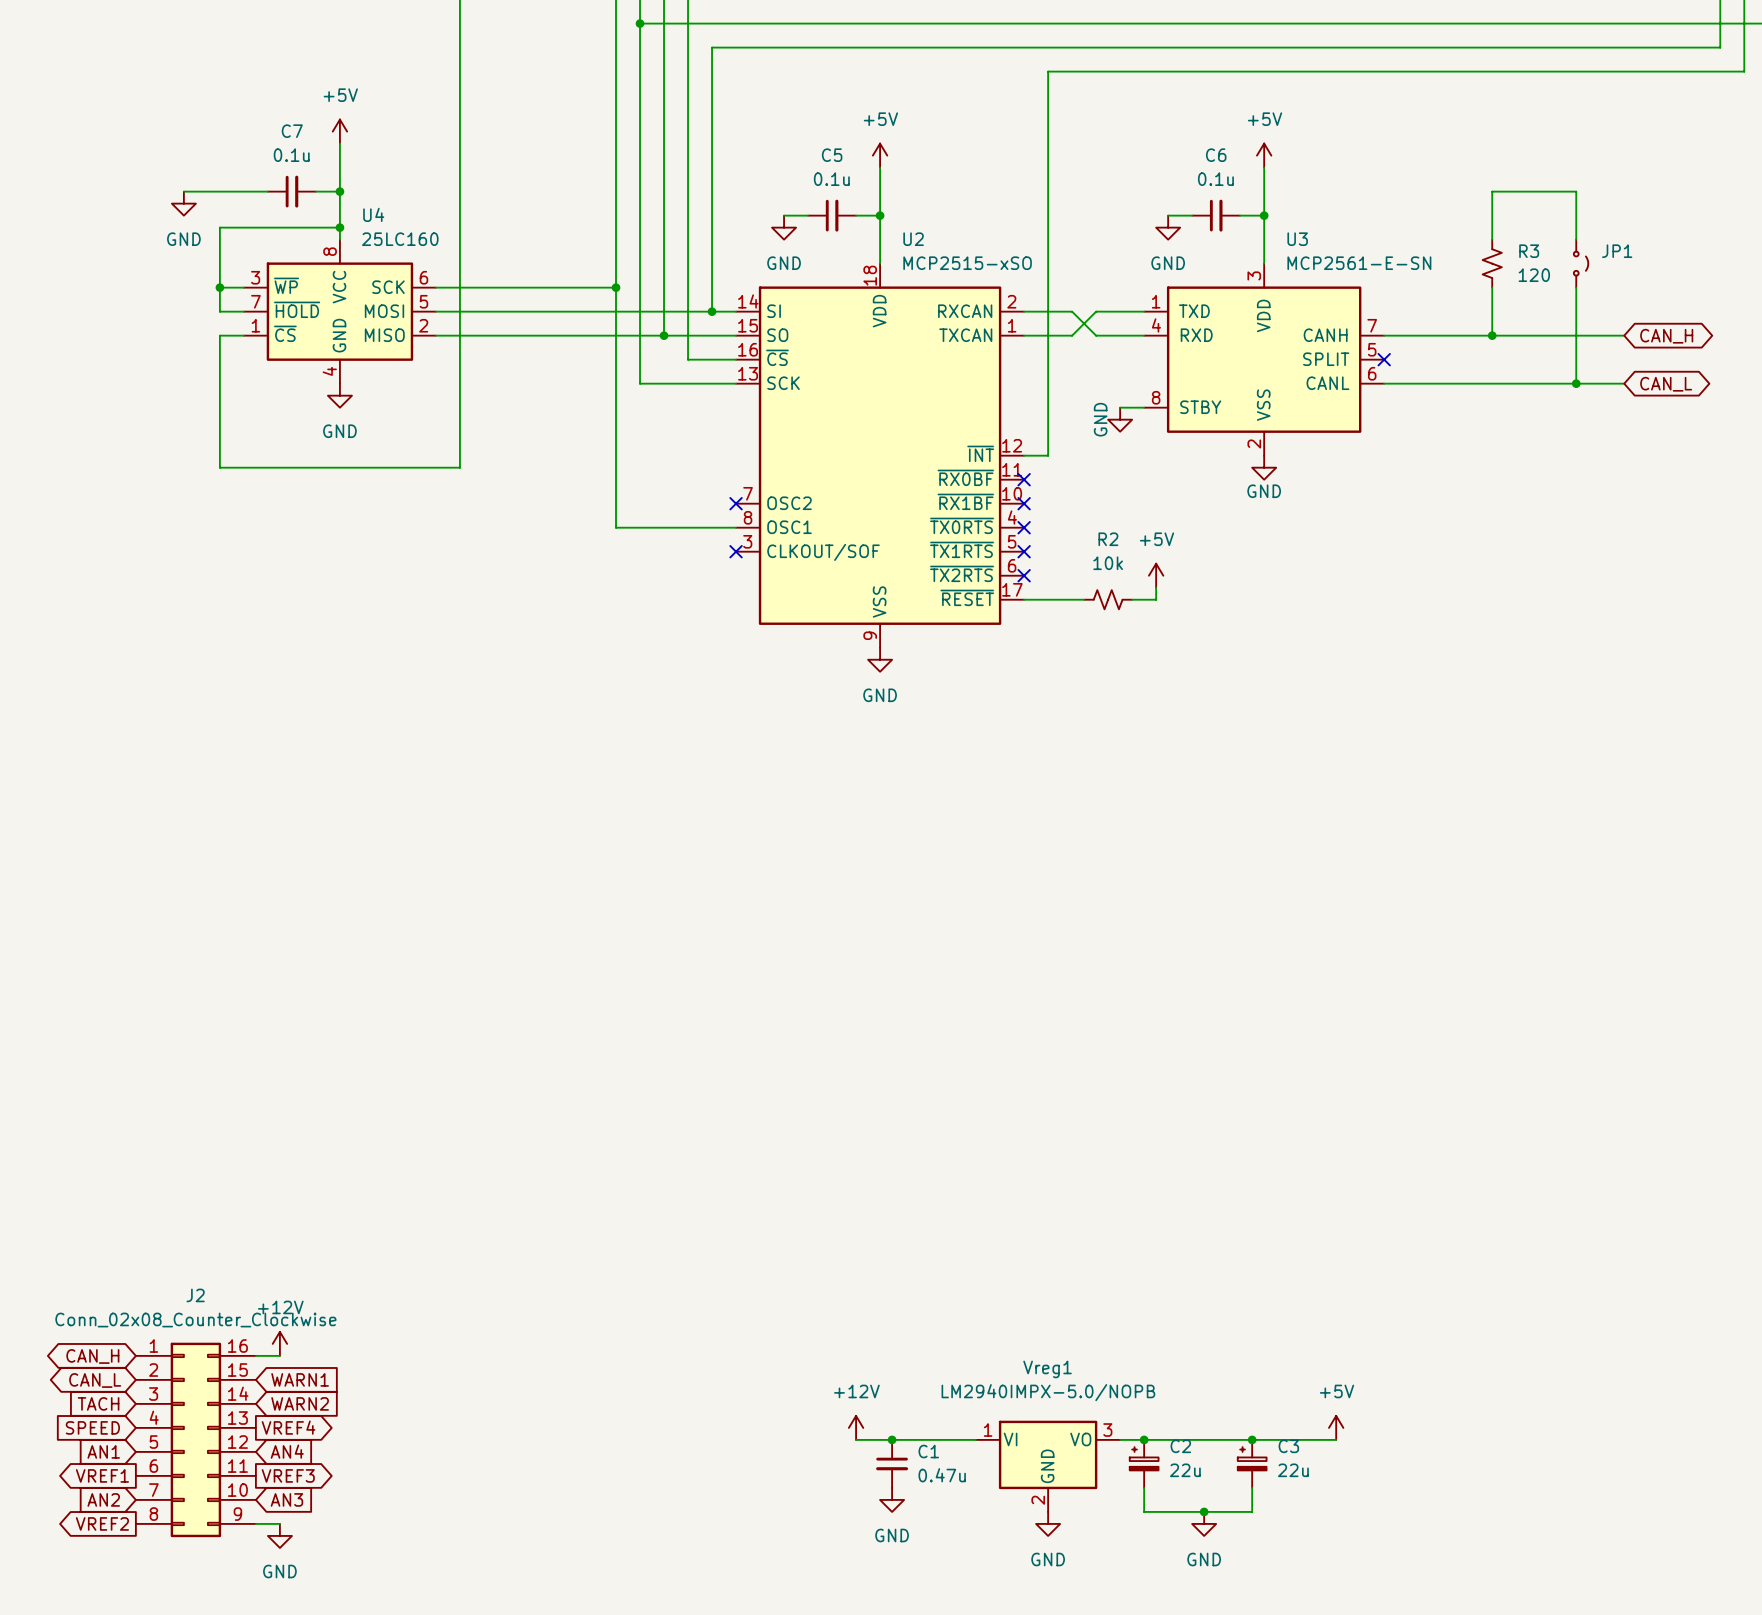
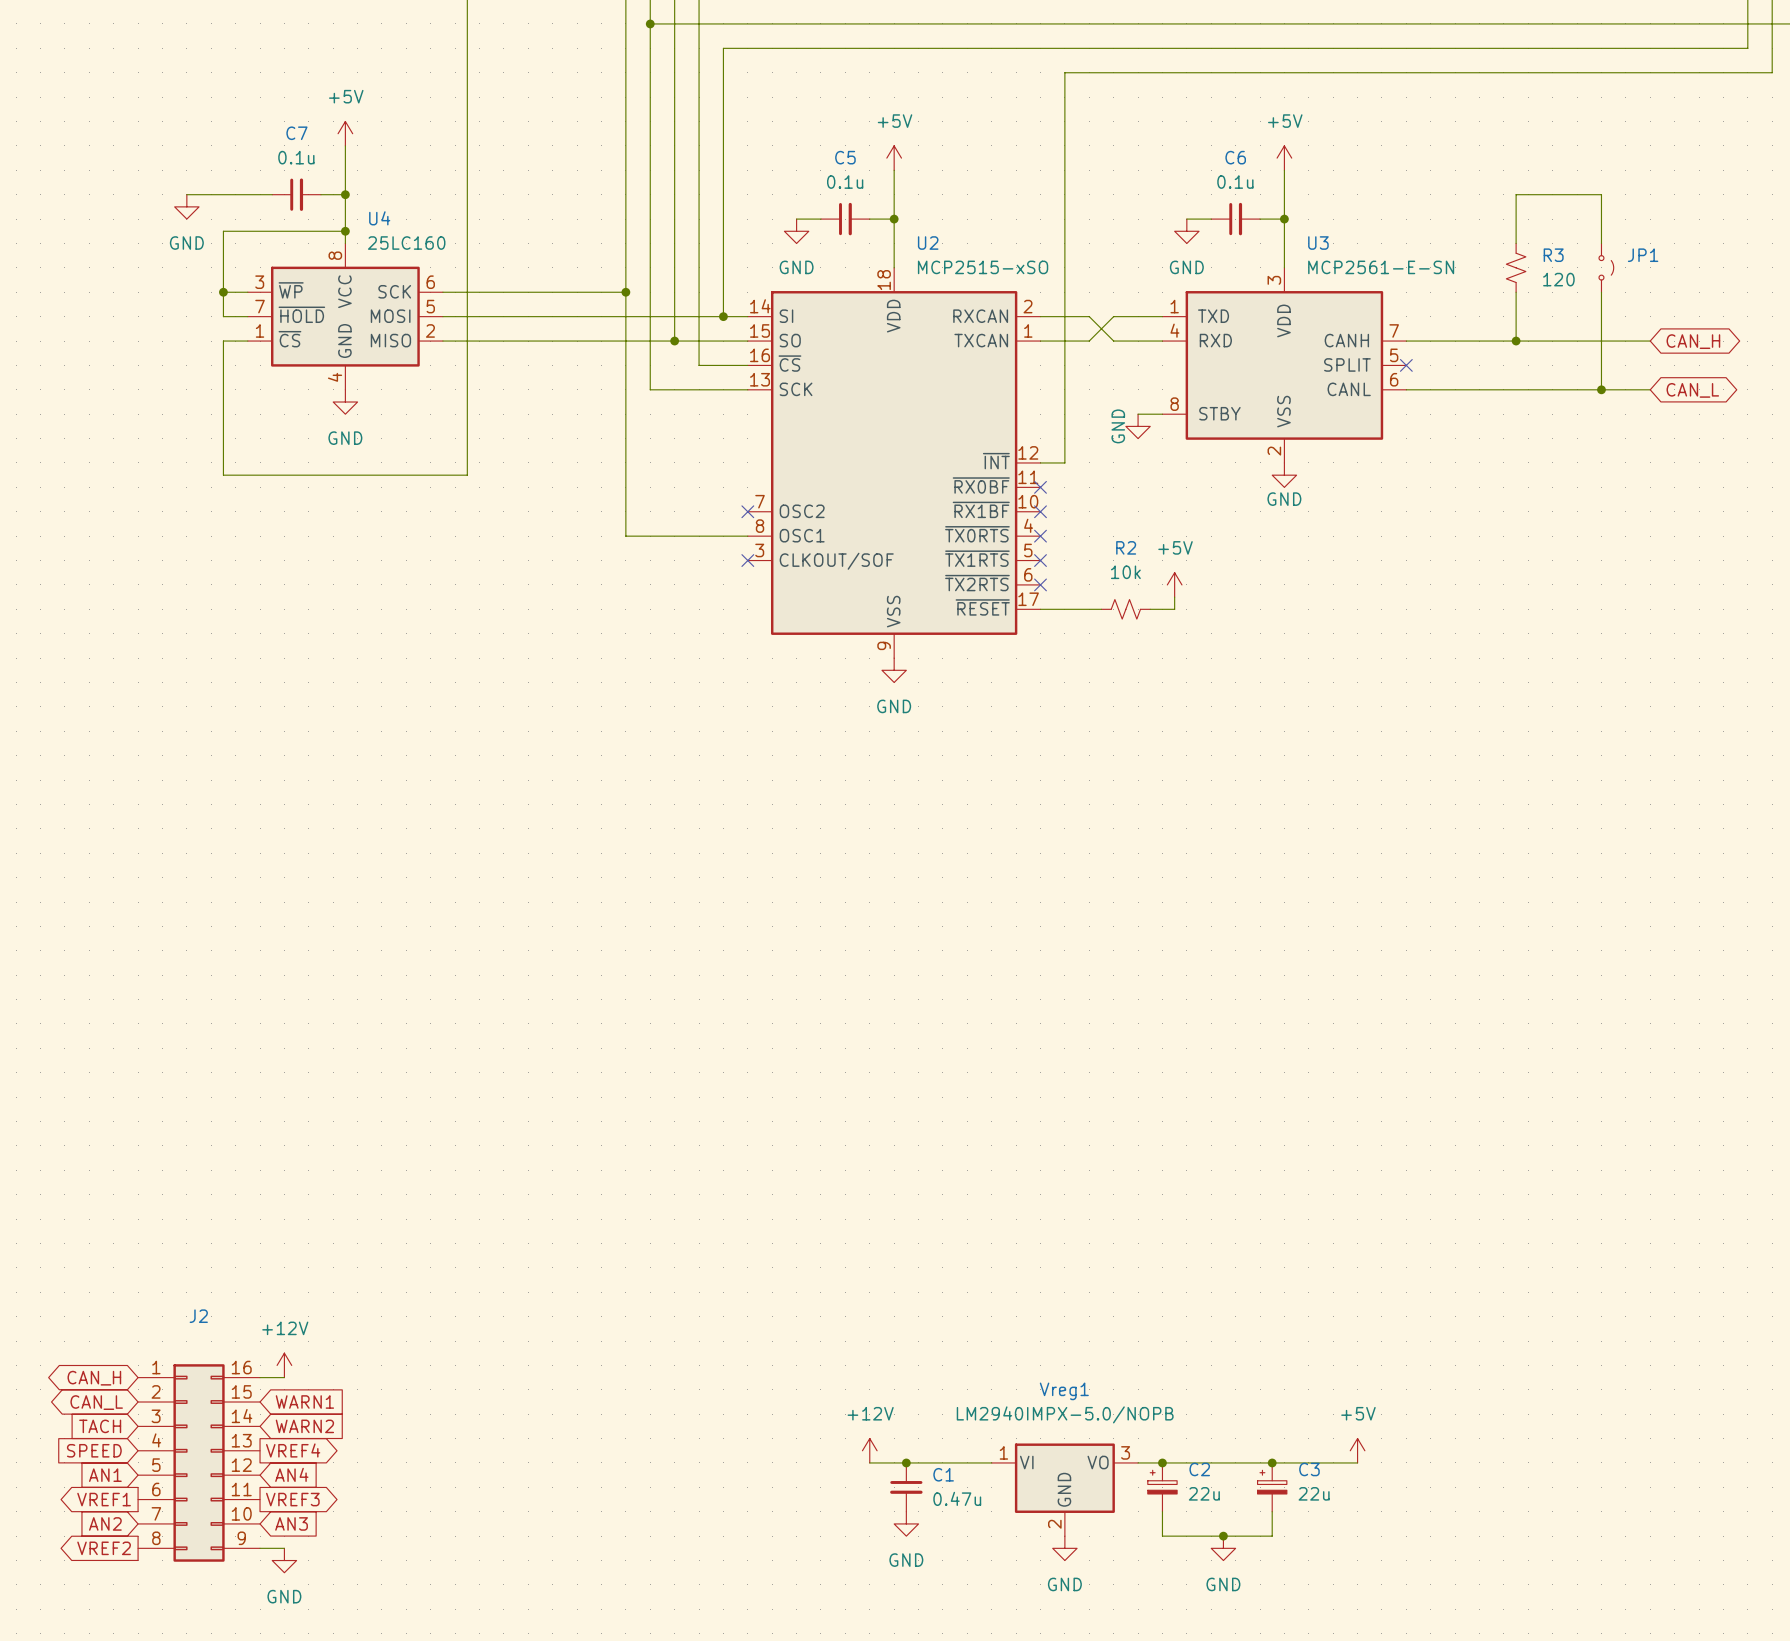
J2 value: Conn_02x08_Counter_Clockwise (195, 1320) -> none

